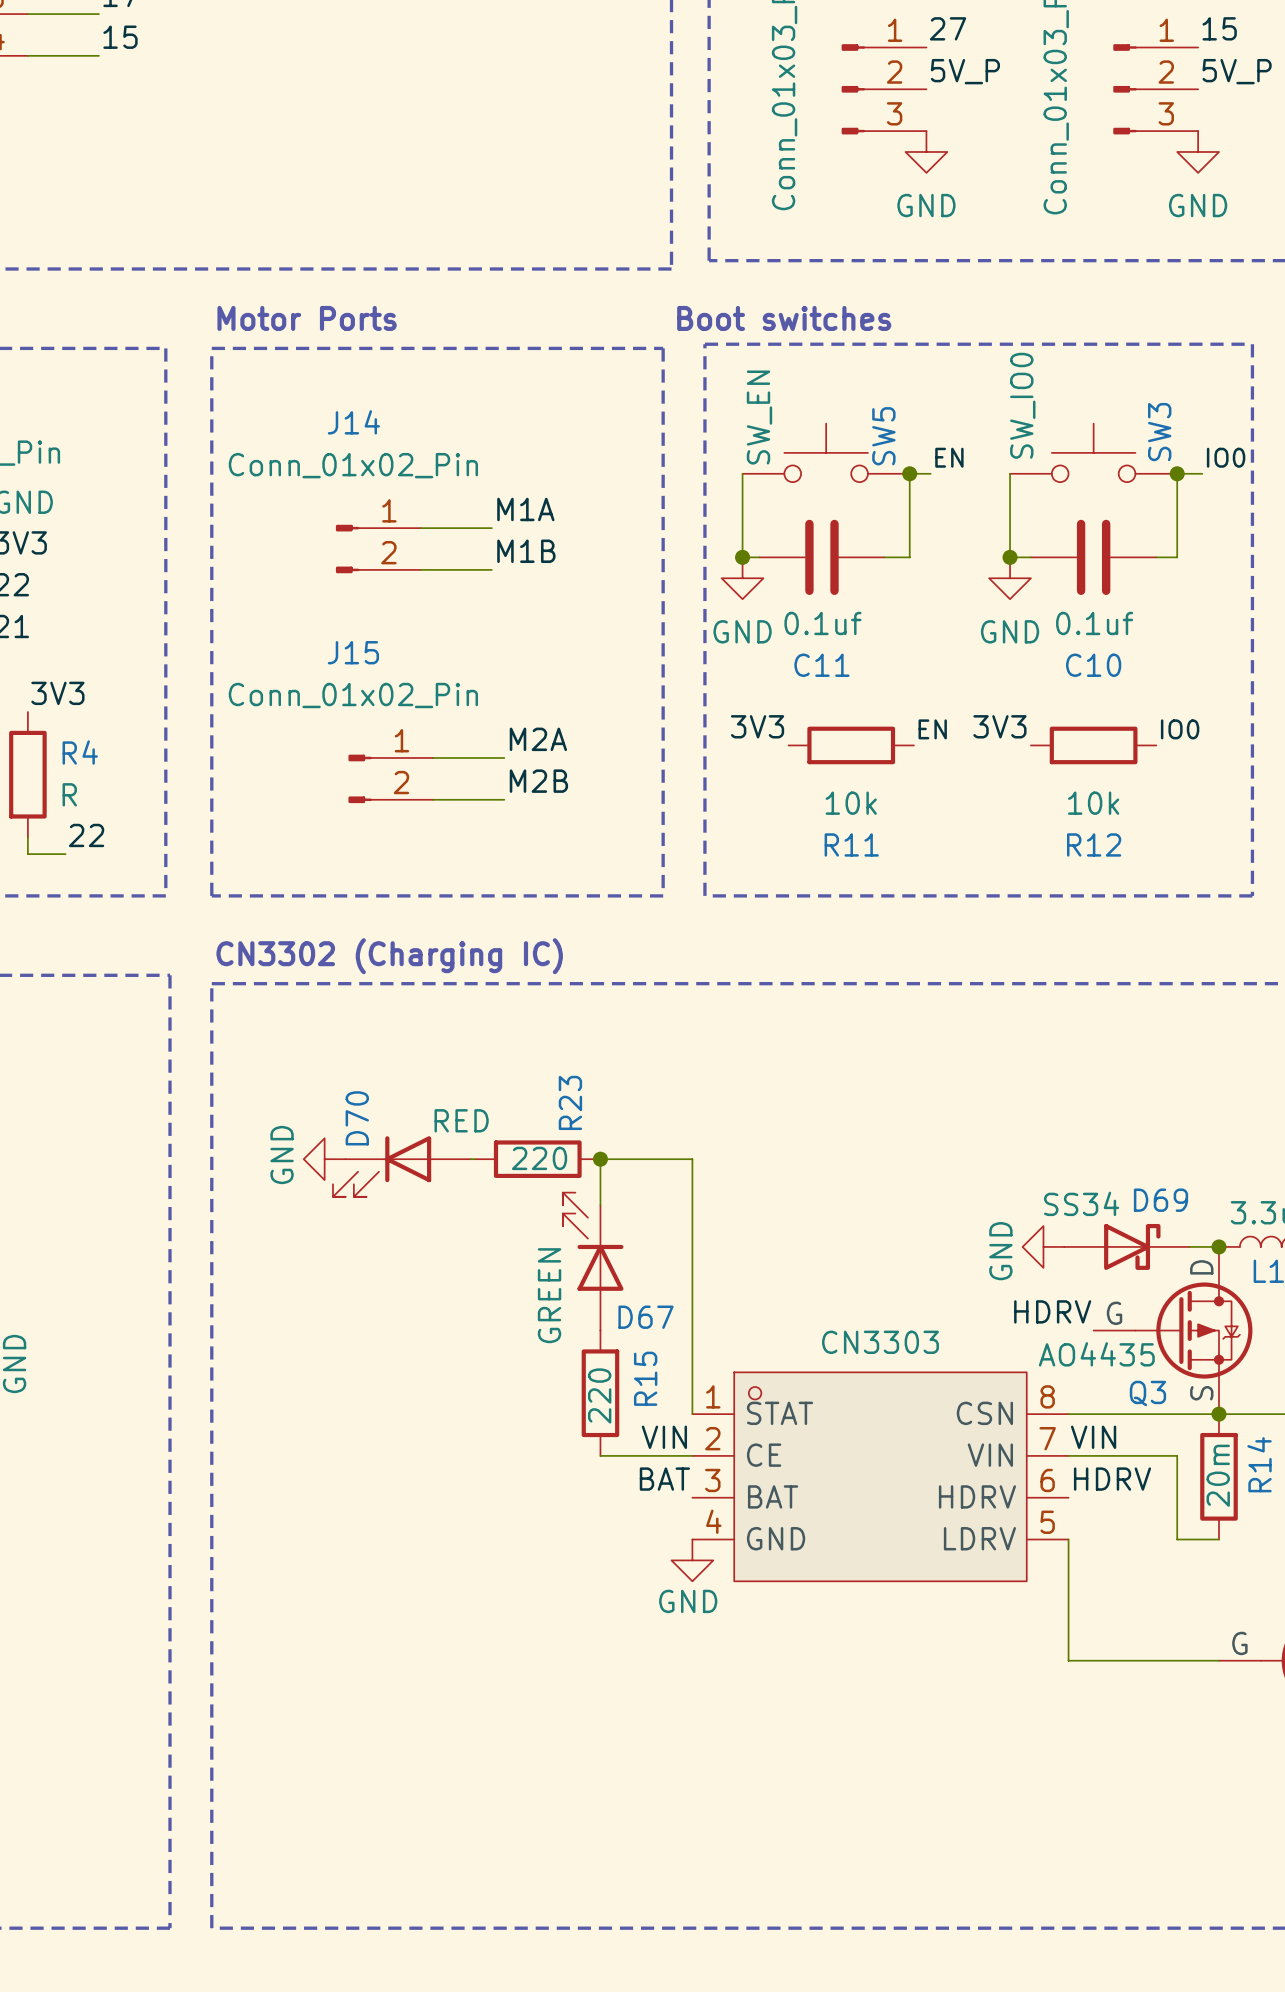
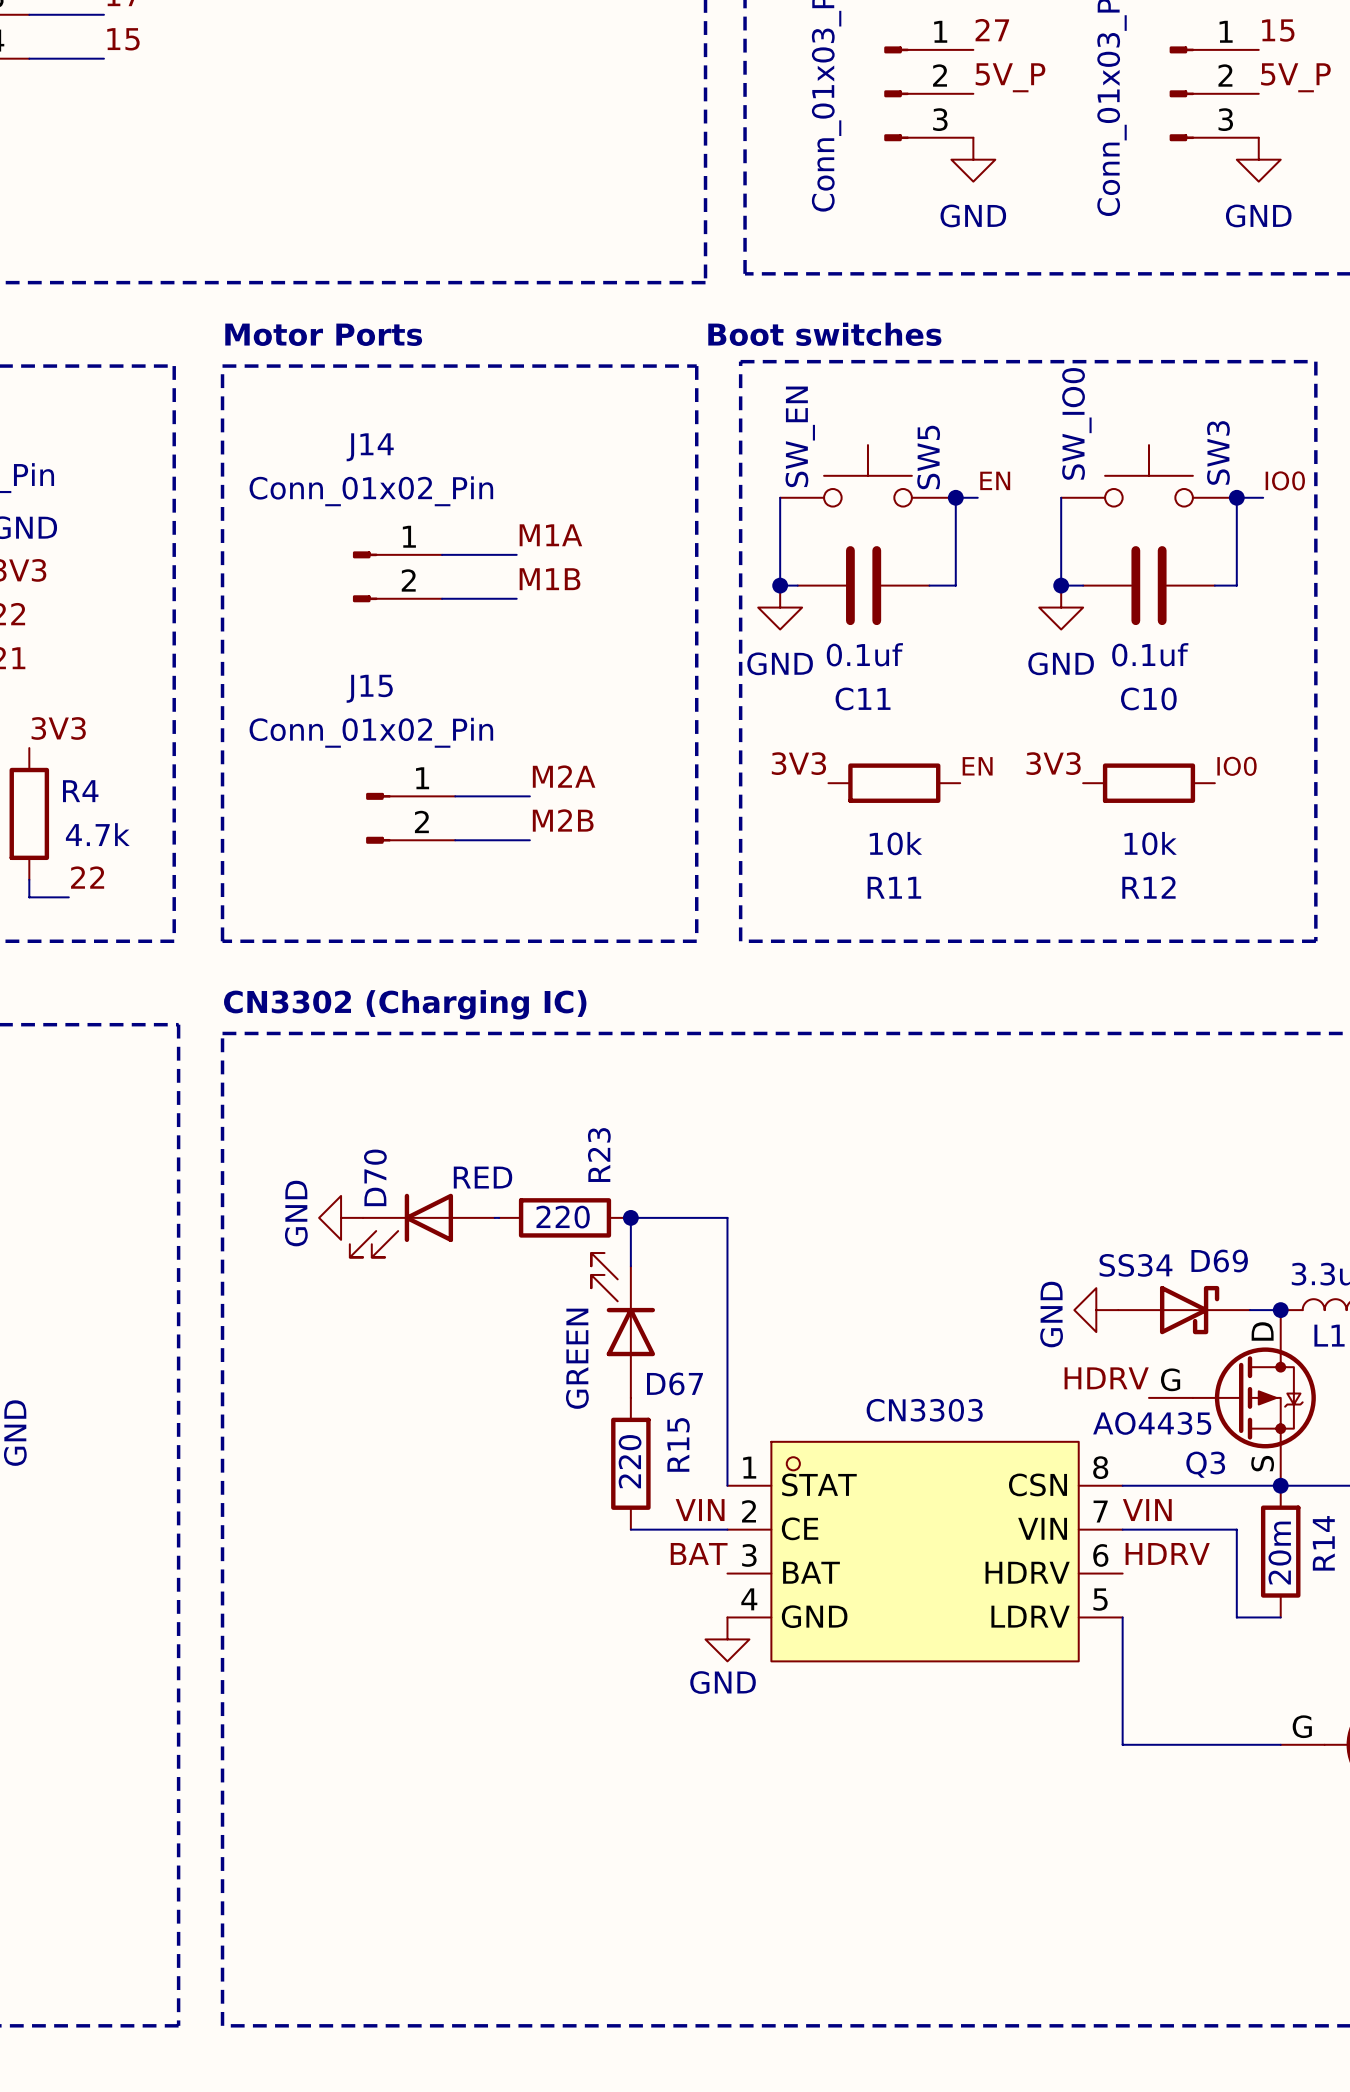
R4 value: R (69, 794) -> 4.7k (97, 834)

